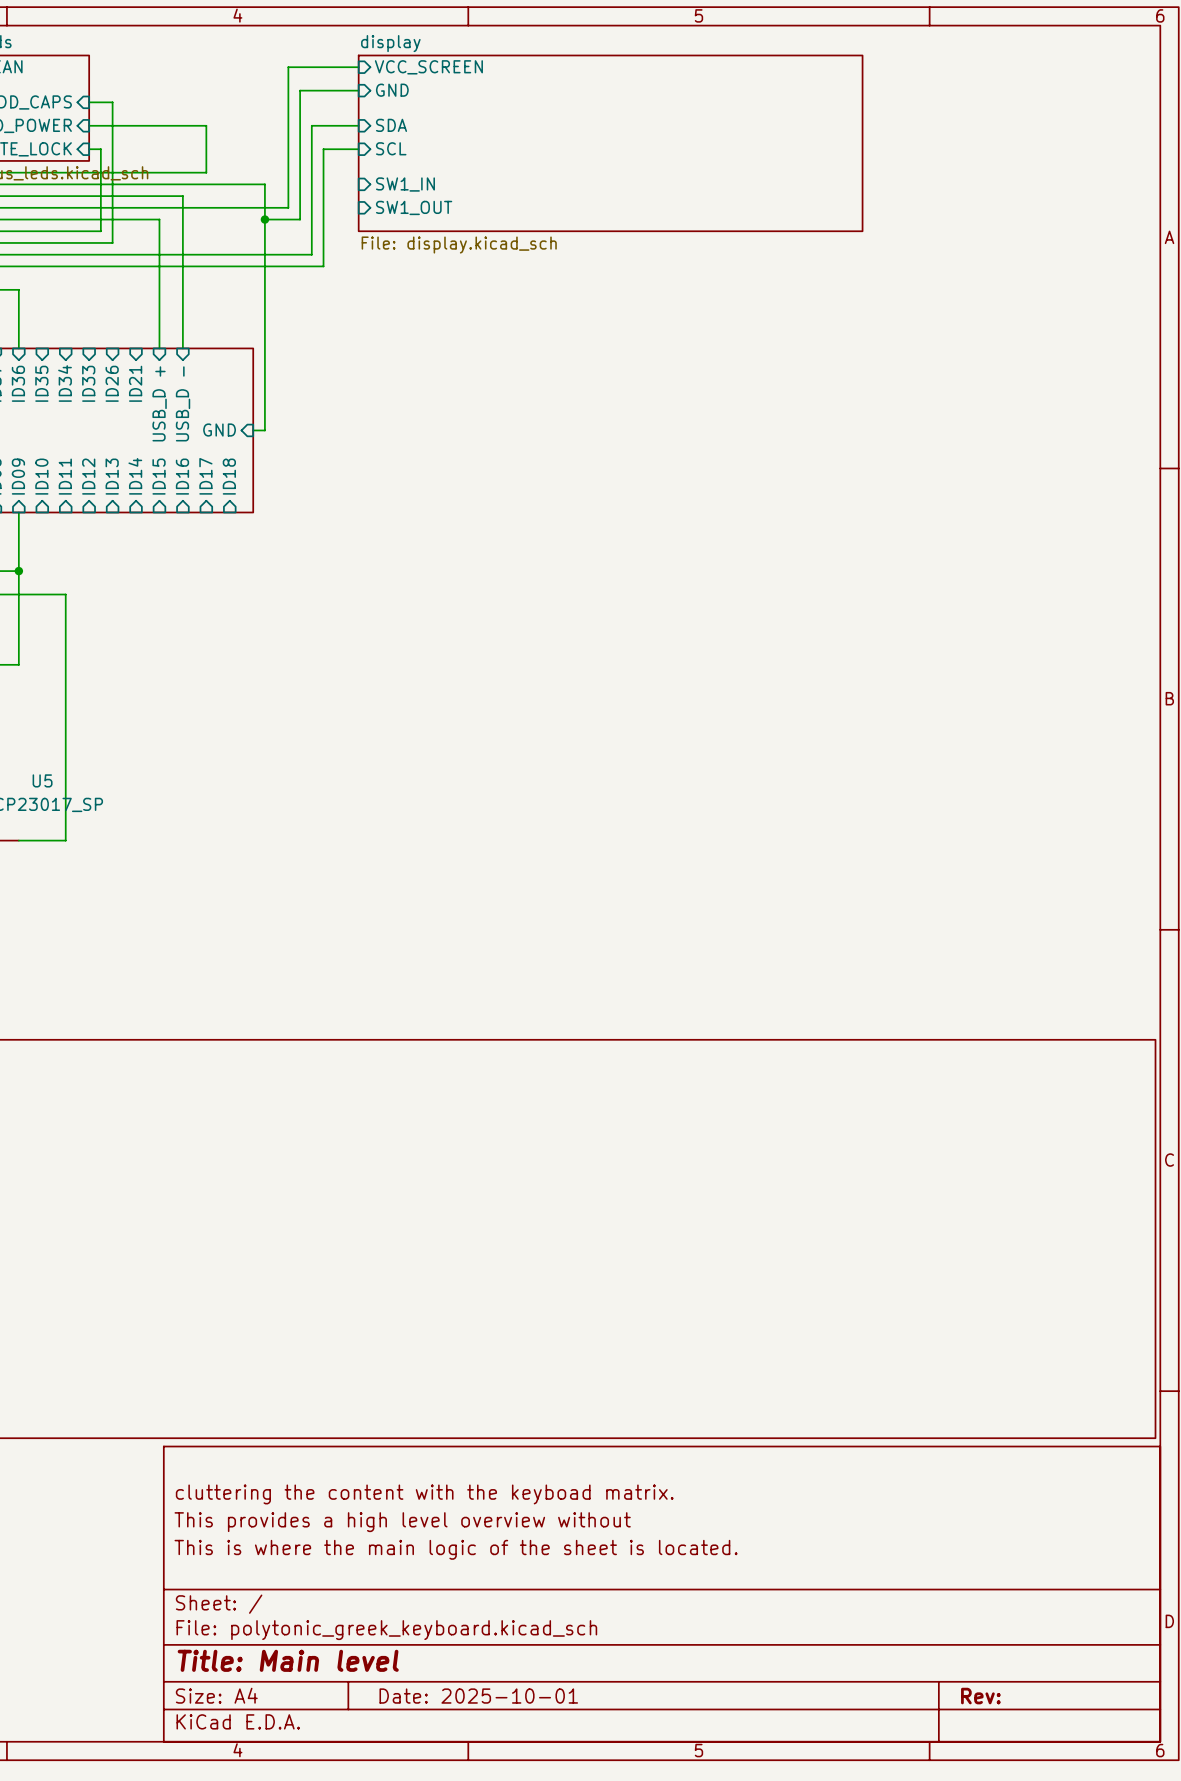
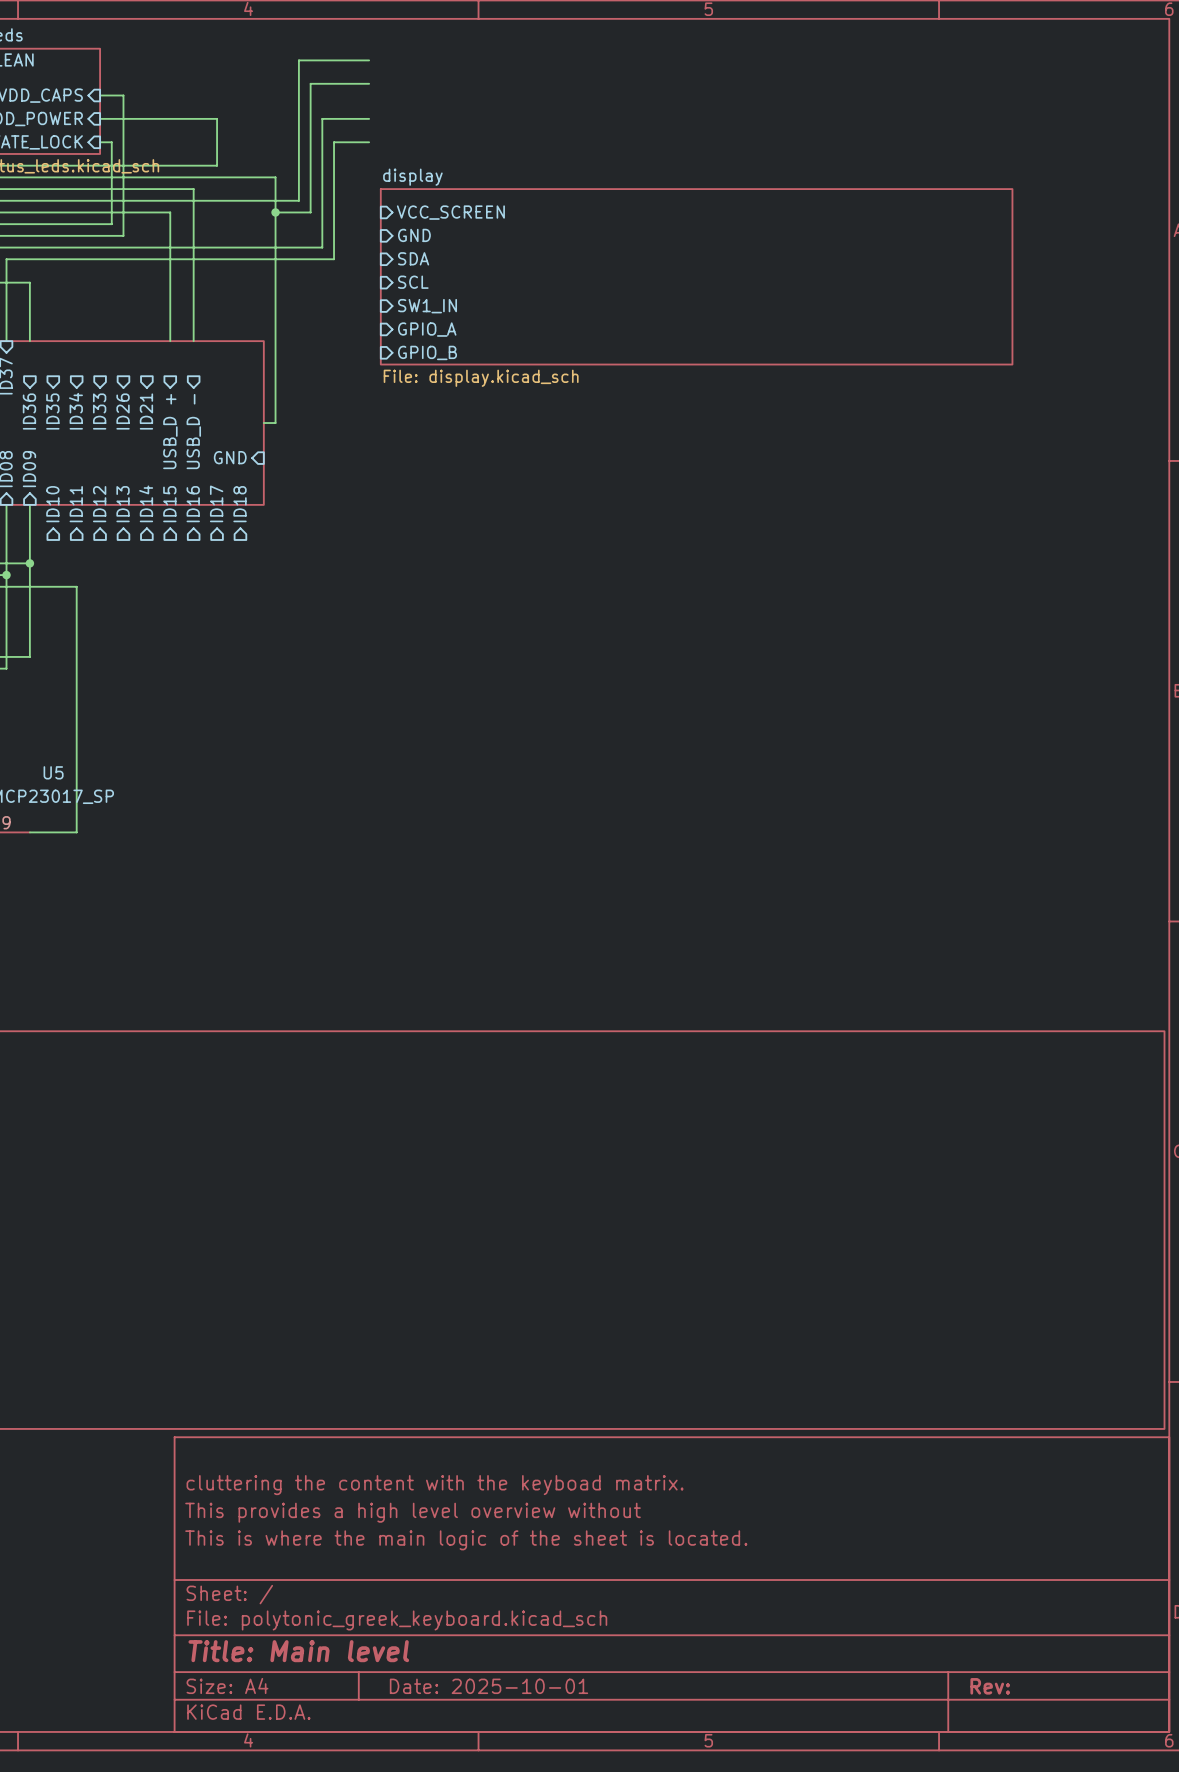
sheet pin position: VCC_SCREEN (428, 67) -> VCC_SCREEN (450, 212)
sheet pin: GND (392, 90) -> none
sheet pin position: SDA (391, 125) -> SDA (413, 258)
sheet display: File: display.kicad_sch (610, 143) -> none
sheet pin position: SCL (391, 148) -> SCL (413, 282)
sheet pin position: SW1_IN (405, 184) -> SW1_IN (427, 306)
sheet pin: SW1_OUT (414, 207) -> none
sheet pin: none -> GND (414, 235)
sheet display: none -> File: display.kicad_sch (696, 276)
sheet pin: none -> GPIO_A (427, 329)
sheet pin: none -> GPIO_B (427, 352)
sheet pin position: ID36 (18, 383) -> ID36 (29, 411)
sheet pin position: ID35 (41, 383) -> ID35 (52, 411)
sheet pin position: ID34 (65, 383) -> ID34 (75, 411)
sheet pin position: ID33 (88, 383) -> ID33 (99, 411)
sheet pin position: ID26 (112, 383) -> ID26 (123, 411)
sheet pin position: ID21 (135, 383) -> ID21 (146, 411)
sheet pin position: USB_D + (159, 403) -> USB_D + (170, 431)
sheet pin position: USB_D - (183, 403) -> USB_D - (193, 431)
sheet pin position: GND (219, 430) -> GND (230, 457)
sheet pin position: ID10 (41, 476) -> ID10 (52, 504)
sheet pin position: ID11 (65, 476) -> ID11 (76, 504)
sheet pin position: ID12 (88, 476) -> ID12 (99, 504)
sheet pin position: ID13 (112, 476) -> ID13 (123, 504)
sheet pin position: ID14 (135, 476) -> ID14 (146, 503)
sheet pin position: ID15 (159, 476) -> ID15 (169, 504)
sheet pin position: ID16 (182, 476) -> ID16 (193, 504)
sheet pin position: ID17 (205, 476) -> ID17 (216, 503)
sheet pin position: ID18 (229, 476) -> ID18 (240, 504)

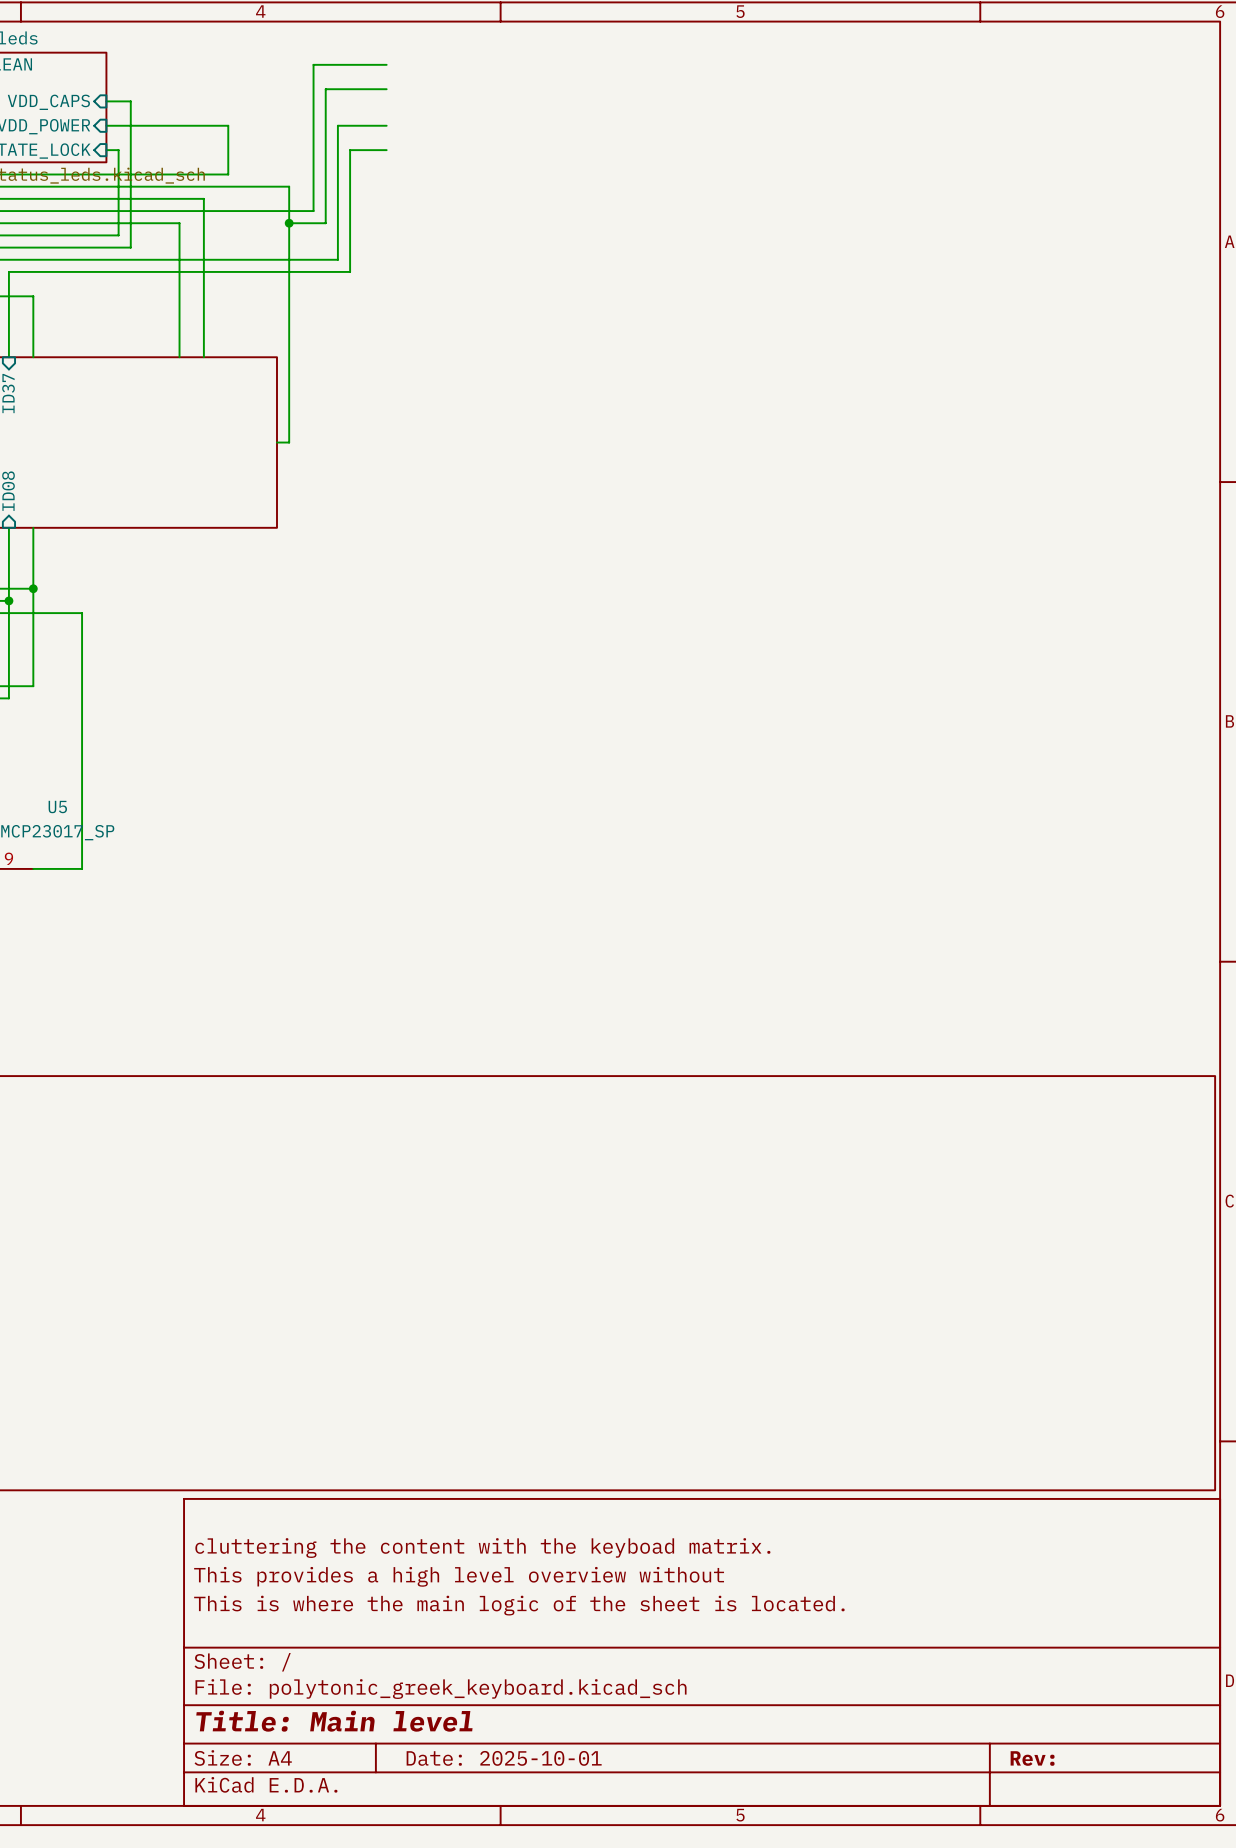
sheet pin: VCC_SCREEN (450, 212) -> none
sheet pin: GND (414, 235) -> none
sheet pin: SDA (413, 258) -> none
sheet display: File: display.kicad_sch (696, 276) -> none
sheet pin: SCL (413, 282) -> none
sheet pin: SW1_IN (427, 306) -> none
sheet pin: GPIO_A (427, 329) -> none
sheet pin: GPIO_B (427, 352) -> none
sheet pin: ID36 (29, 411) -> none
sheet pin: ID35 (52, 411) -> none
sheet pin: ID34 (75, 411) -> none
sheet pin: ID33 (99, 411) -> none
sheet pin: ID26 (123, 411) -> none
sheet pin: ID21 (146, 411) -> none
sheet pin: USB_D + (170, 431) -> none
sheet pin: USB_D - (193, 431) -> none
sheet pin: GND (230, 457) -> none
sheet pin: ID09 (29, 469) -> none
sheet pin: ID14 (146, 503) -> none
sheet pin: ID17 (216, 503) -> none
sheet pin: ID10 (52, 504) -> none
sheet pin: ID11 (76, 504) -> none
sheet pin: ID12 (99, 504) -> none
sheet pin: ID13 (123, 504) -> none
sheet pin: ID15 (169, 504) -> none
sheet pin: ID16 (193, 504) -> none
sheet pin: ID18 (240, 504) -> none

